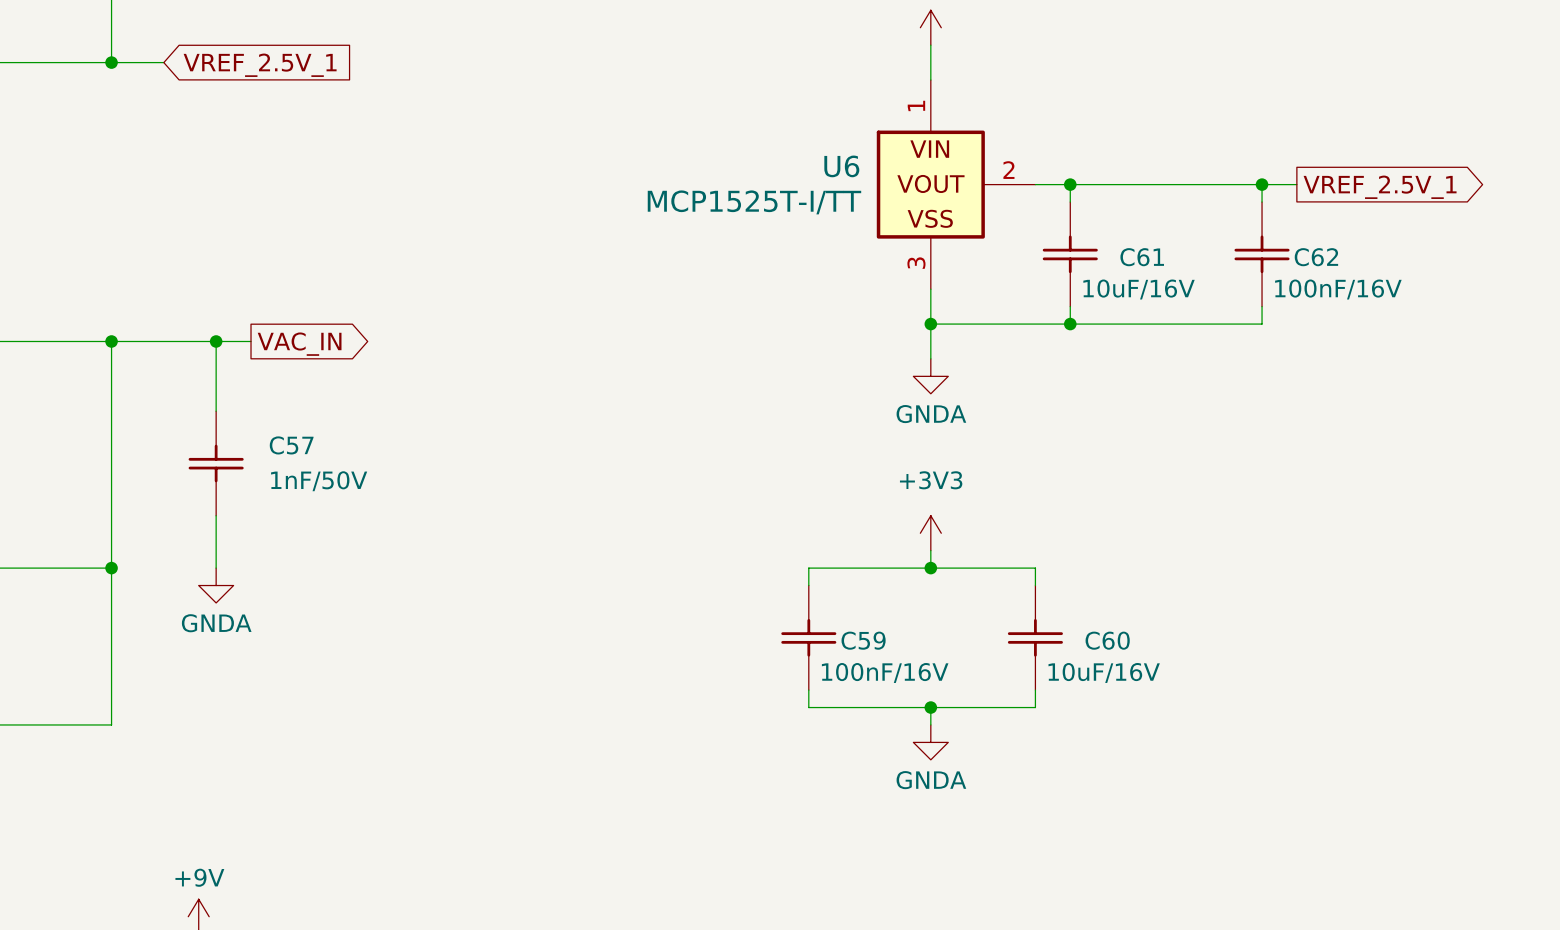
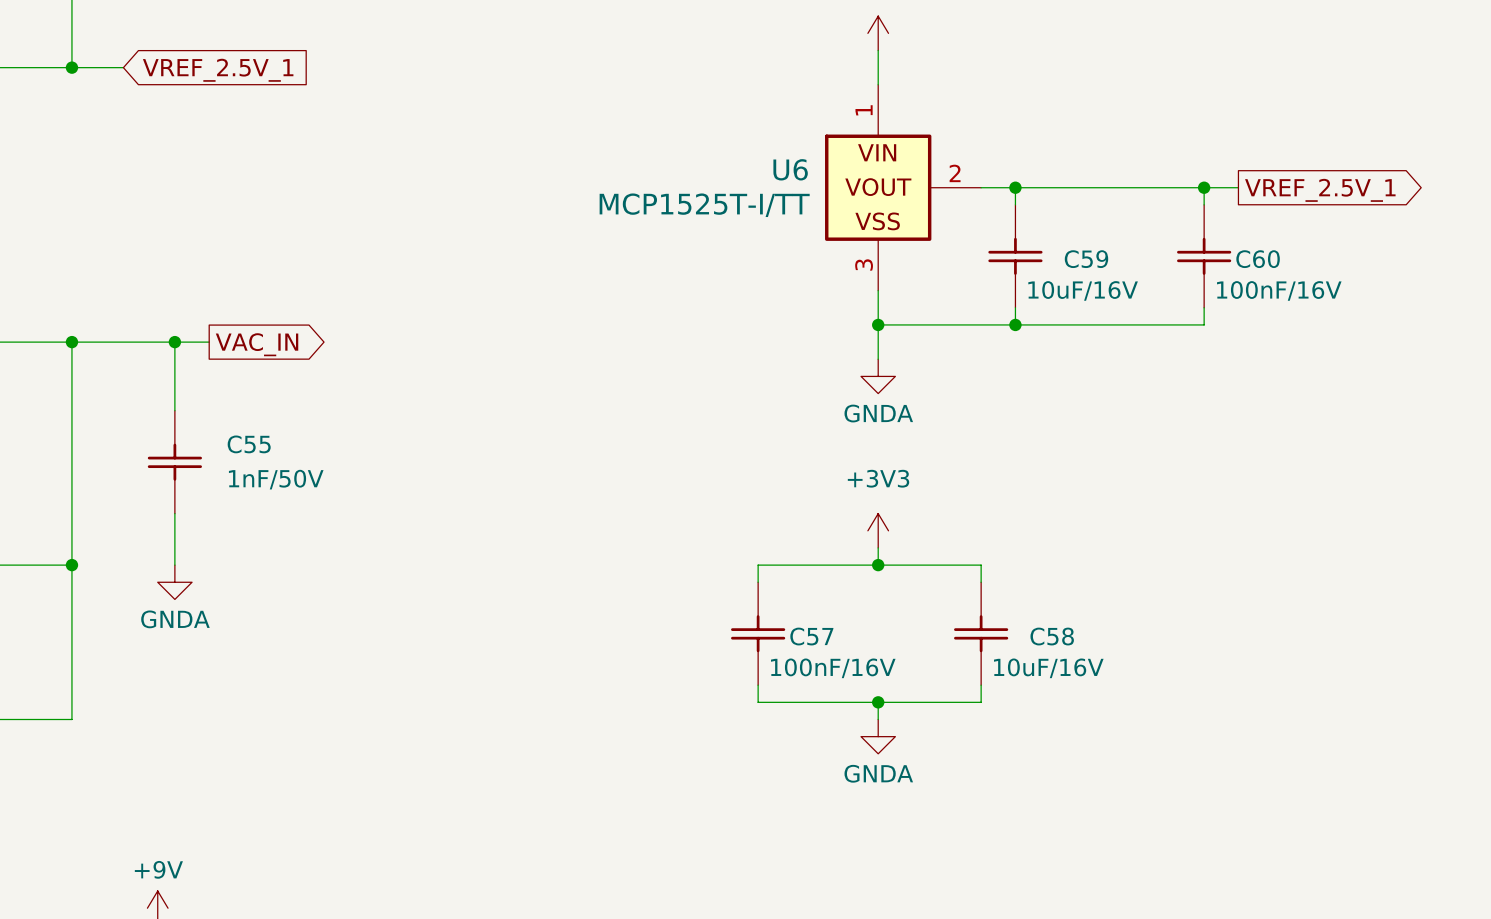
C61 name: C61 (1142, 257) -> C59 (1086, 259)
C62 name: C62 (1316, 257) -> C60 (1258, 259)
C57 name: C57 (291, 445) -> C55 (249, 444)
C59 name: C59 (863, 640) -> C57 (811, 636)
C60 name: C60 (1107, 640) -> C58 (1052, 636)

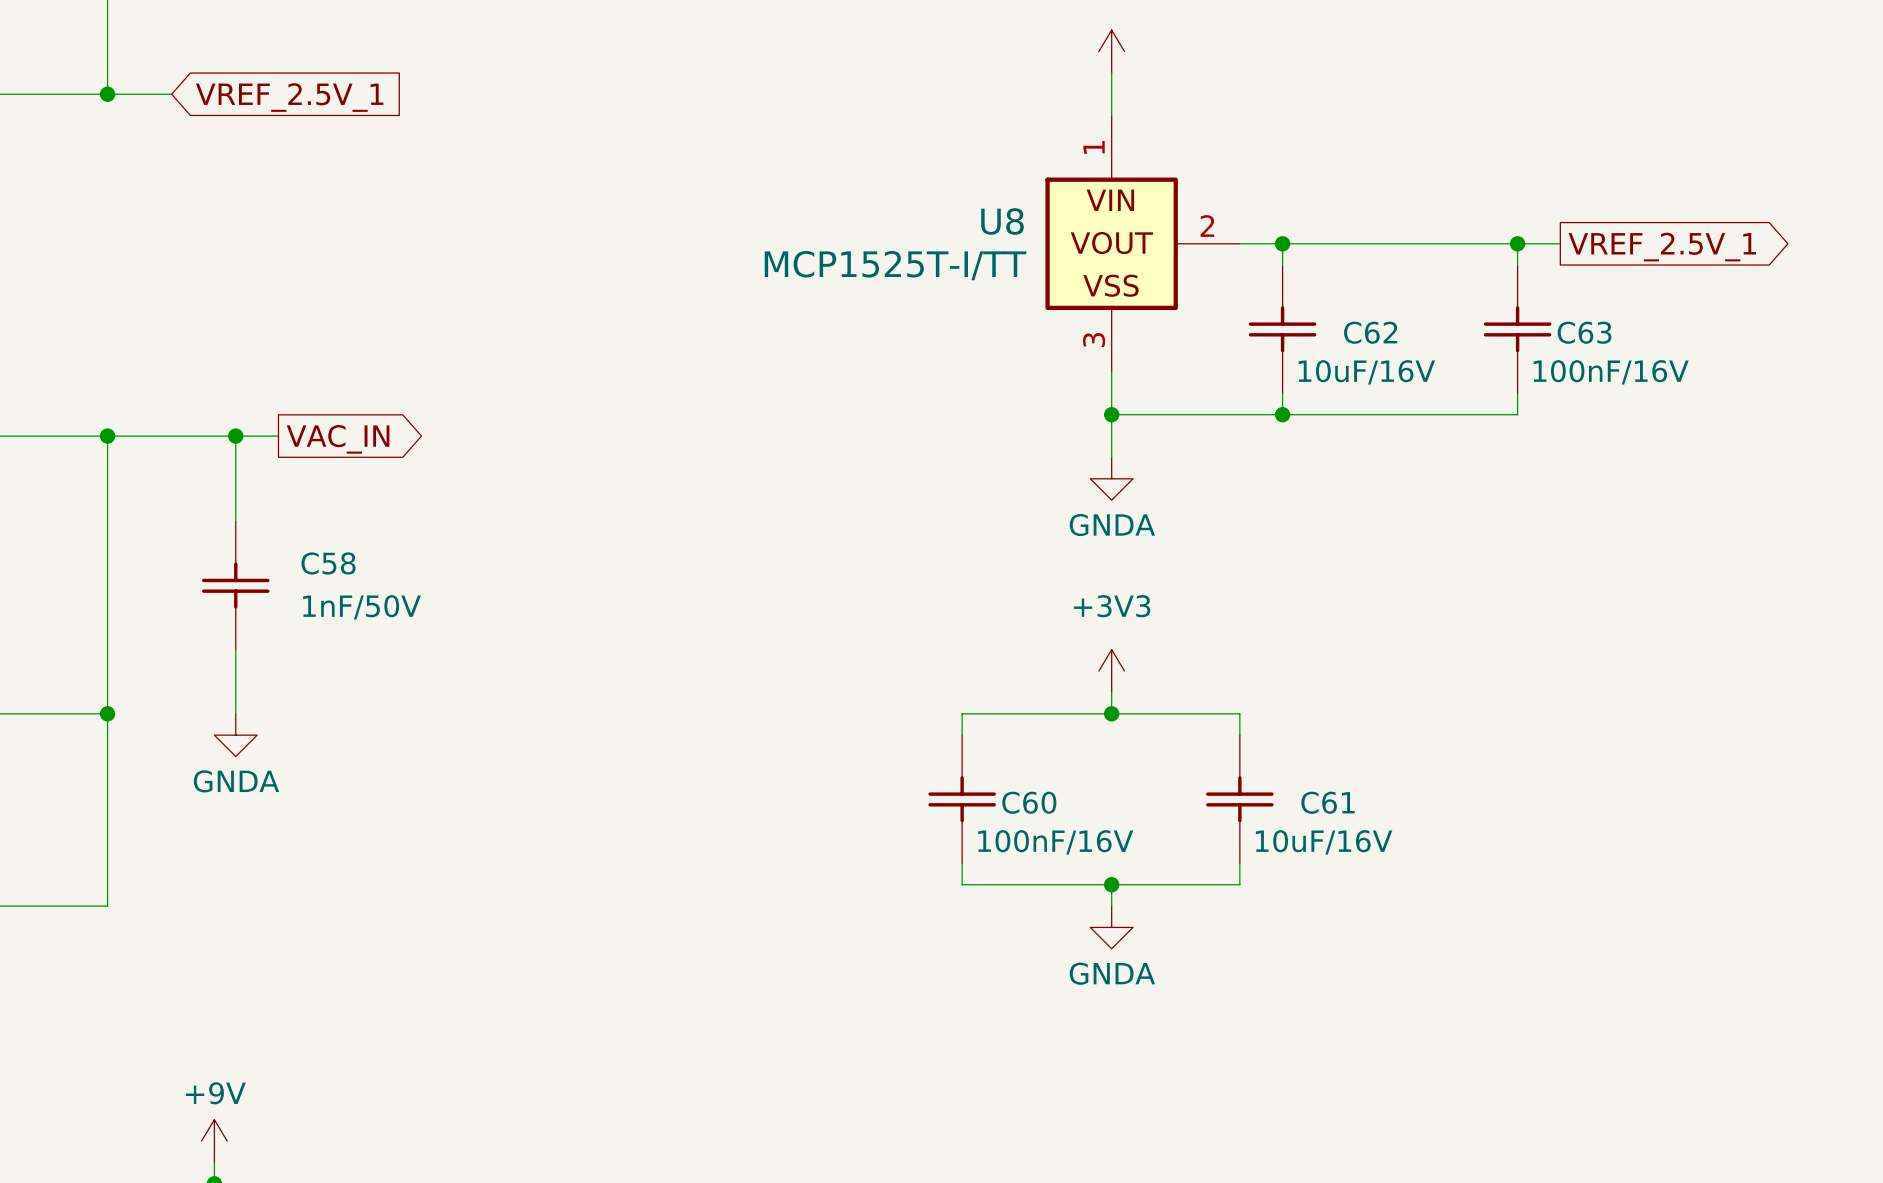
U6 name: U6 (790, 169) -> U8 (1002, 221)
C59 name: C59 (1086, 259) -> C62 (1370, 332)
C60 name: C60 (1258, 259) -> C63 (1584, 332)
C55 name: C55 (249, 444) -> C58 (328, 563)
C57 name: C57 (811, 636) -> C60 (1029, 802)
C58 name: C58 (1052, 636) -> C61 (1328, 802)

